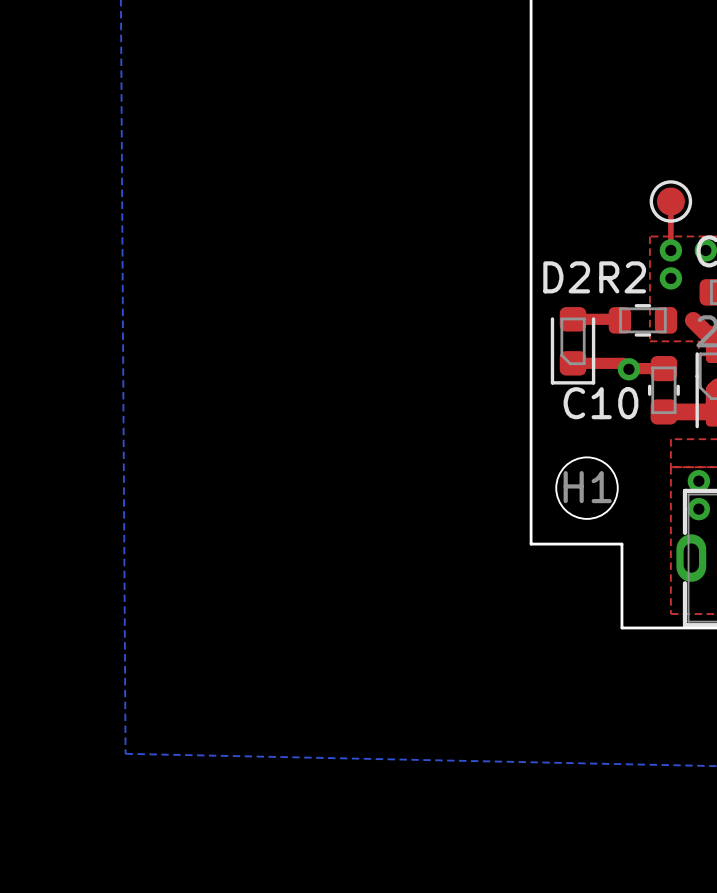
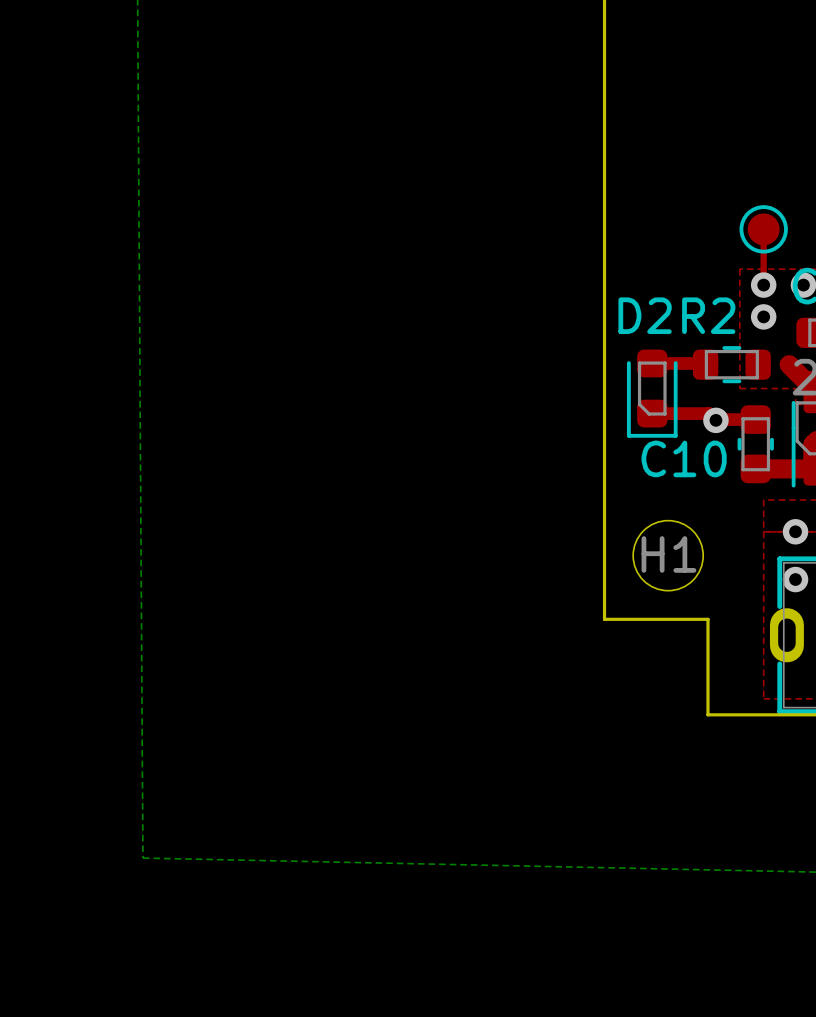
via position: (698, 481) -> (795, 531)

